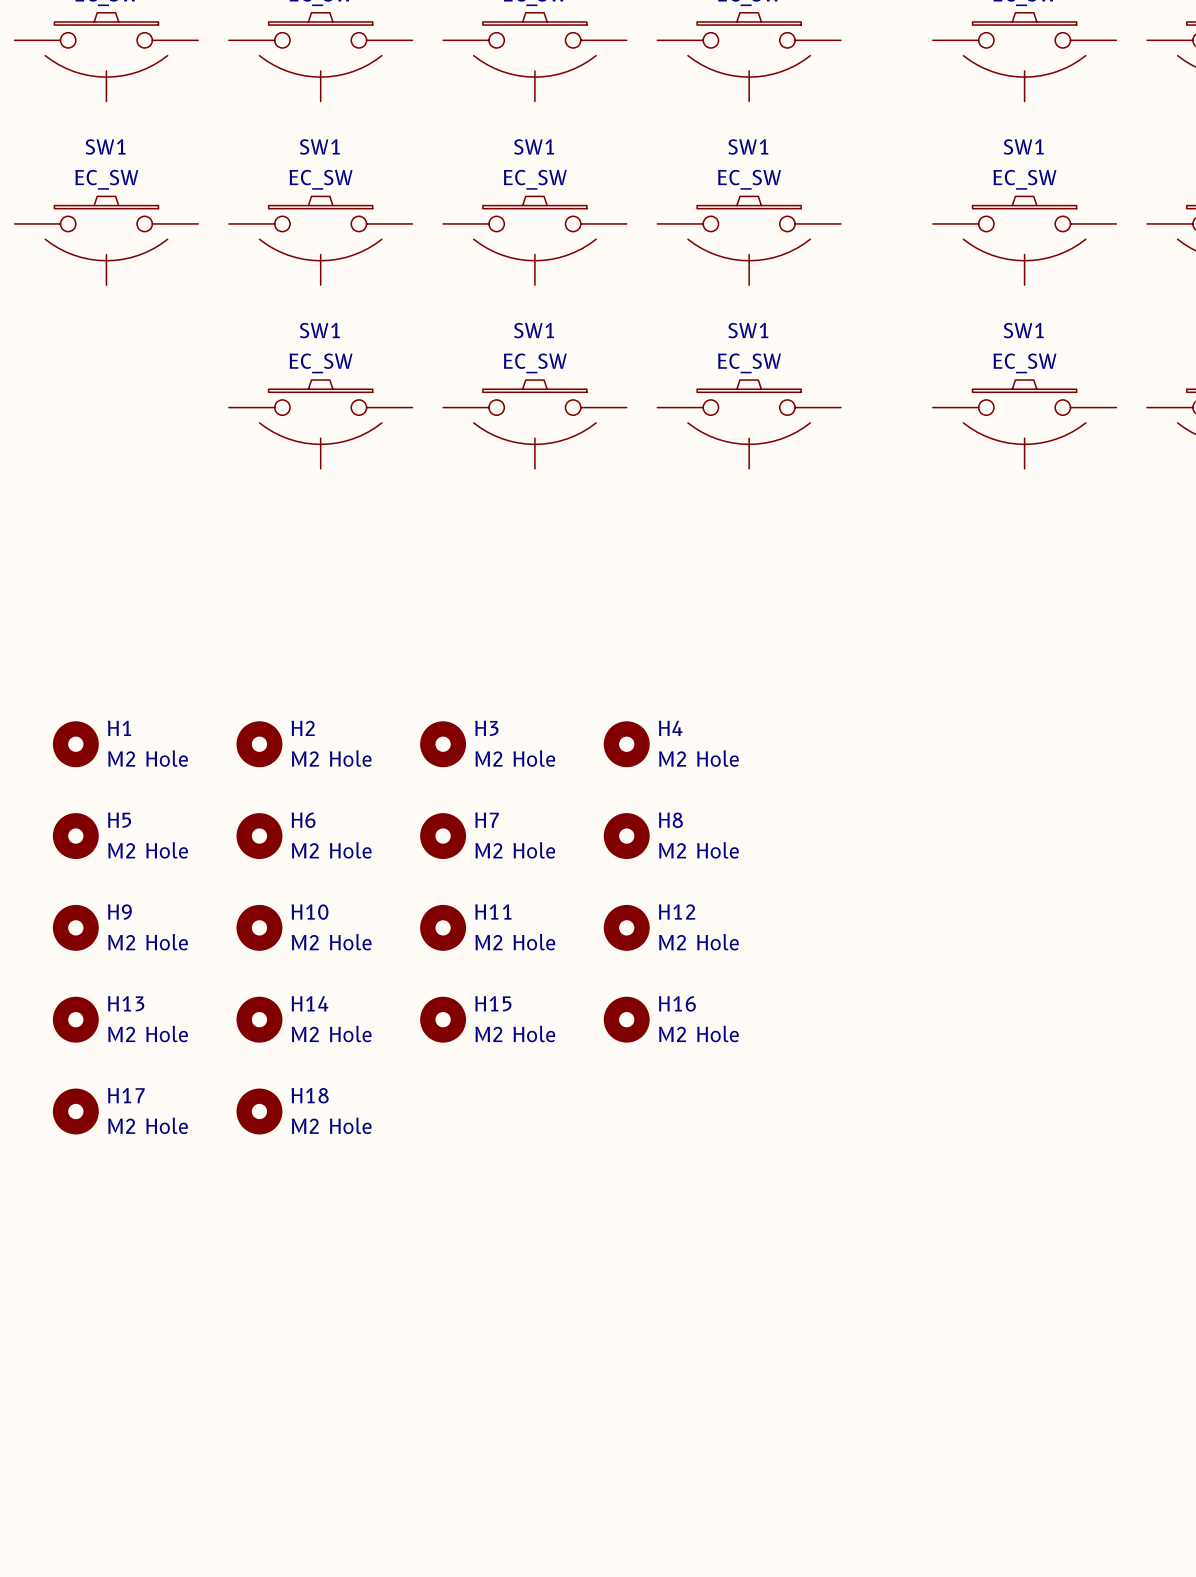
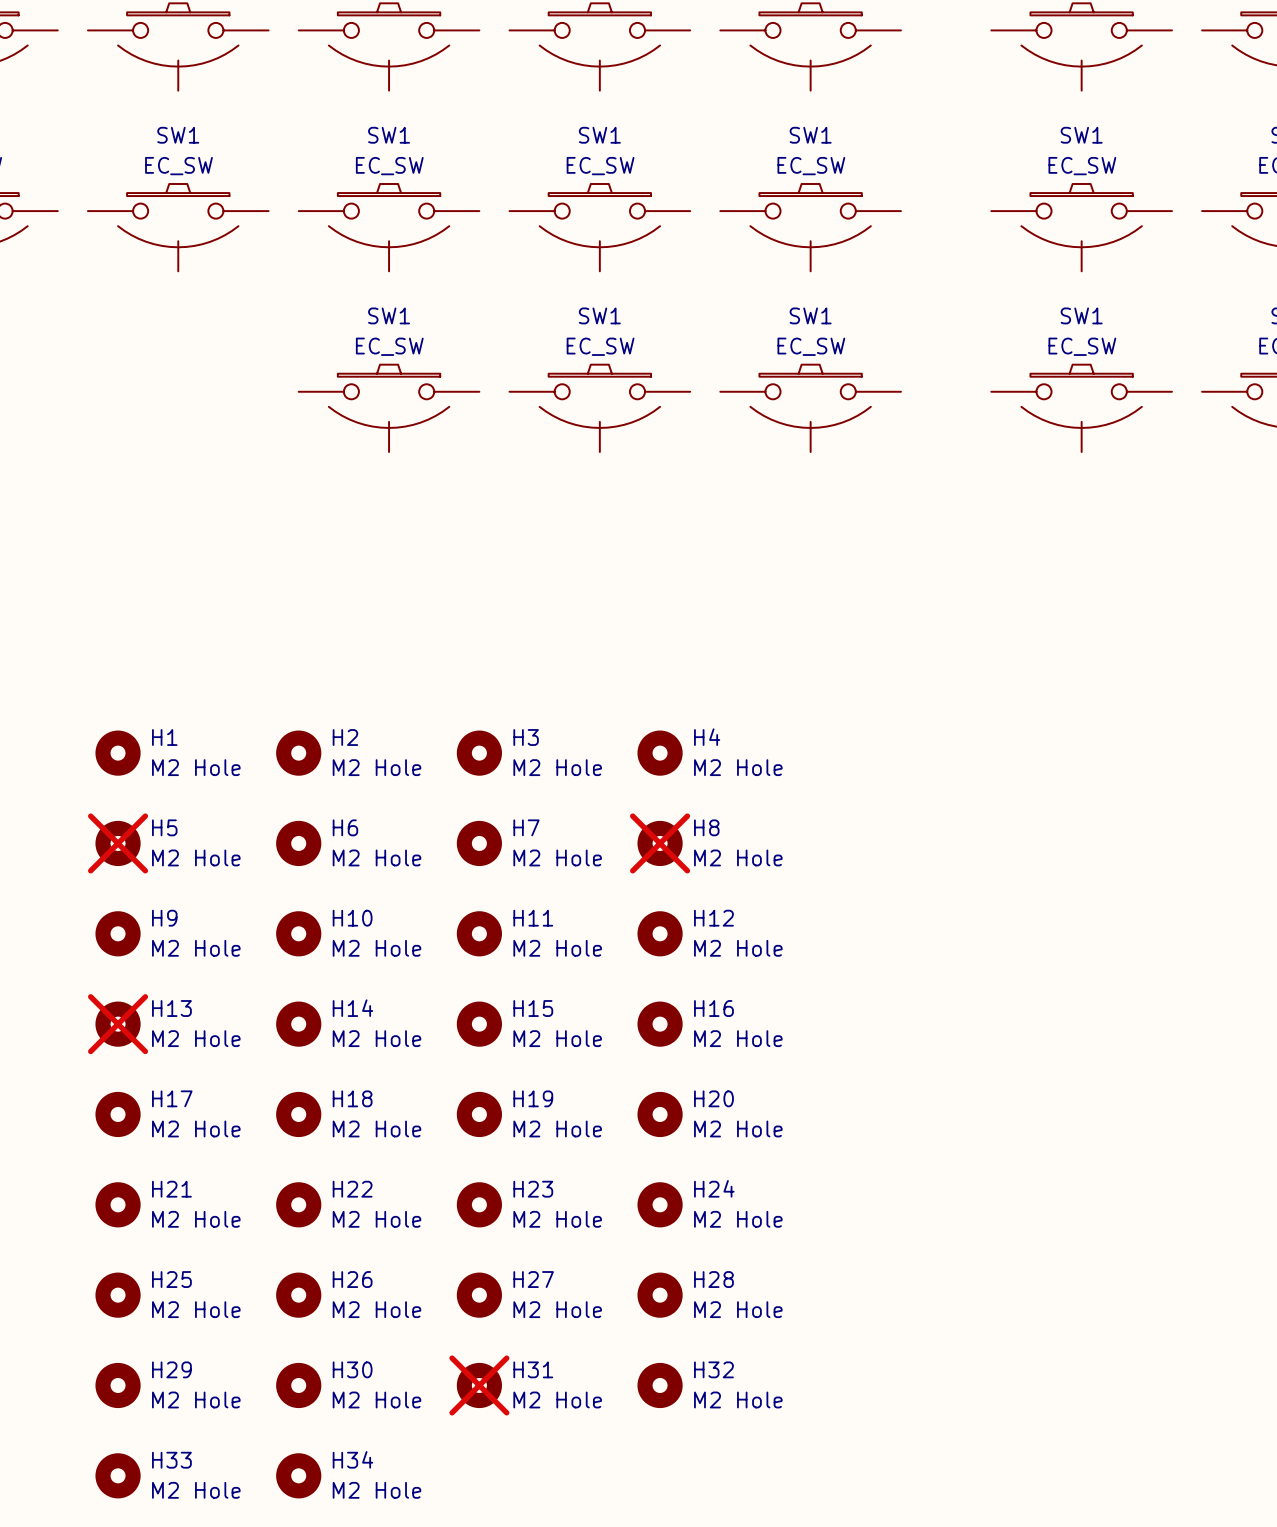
H1 position: (75, 744) -> (118, 753)
H2 position: (259, 744) -> (298, 753)
H3 position: (443, 744) -> (479, 753)
H4 position: (626, 744) -> (660, 753)
H5 position: (75, 836) -> (118, 843)
H6 position: (259, 836) -> (298, 843)
H7 position: (443, 836) -> (479, 843)
H8 position: (626, 836) -> (660, 843)
H5 do-not-place cross: none -> (118, 843)
H8 do-not-place cross: none -> (660, 843)
H9 position: (75, 927) -> (118, 933)
H10 position: (259, 927) -> (298, 933)
H11 position: (443, 927) -> (479, 933)
H12 position: (626, 927) -> (660, 933)
H13 position: (75, 1019) -> (118, 1024)
H14 position: (259, 1019) -> (298, 1024)
H15 position: (443, 1019) -> (479, 1024)
H16 position: (626, 1019) -> (660, 1024)
H13 do-not-place cross: none -> (118, 1024)
H17 position: (75, 1111) -> (118, 1114)
H18 position: (259, 1111) -> (298, 1114)
H19: none -> M2 Hole (479, 1114)
H20: none -> M2 Hole (660, 1114)
H21: none -> M2 Hole (118, 1204)
H22: none -> M2 Hole (298, 1204)
H23: none -> M2 Hole (479, 1204)
H24: none -> M2 Hole (660, 1204)
H25: none -> M2 Hole (118, 1295)
H26: none -> M2 Hole (298, 1295)
H27: none -> M2 Hole (479, 1295)
H28: none -> M2 Hole (660, 1295)
H29: none -> M2 Hole (118, 1385)
H30: none -> M2 Hole (298, 1385)
H31: none -> M2 Hole (479, 1385)
H32: none -> M2 Hole (660, 1385)
H33: none -> M2 Hole (118, 1475)
H34: none -> M2 Hole (298, 1475)

